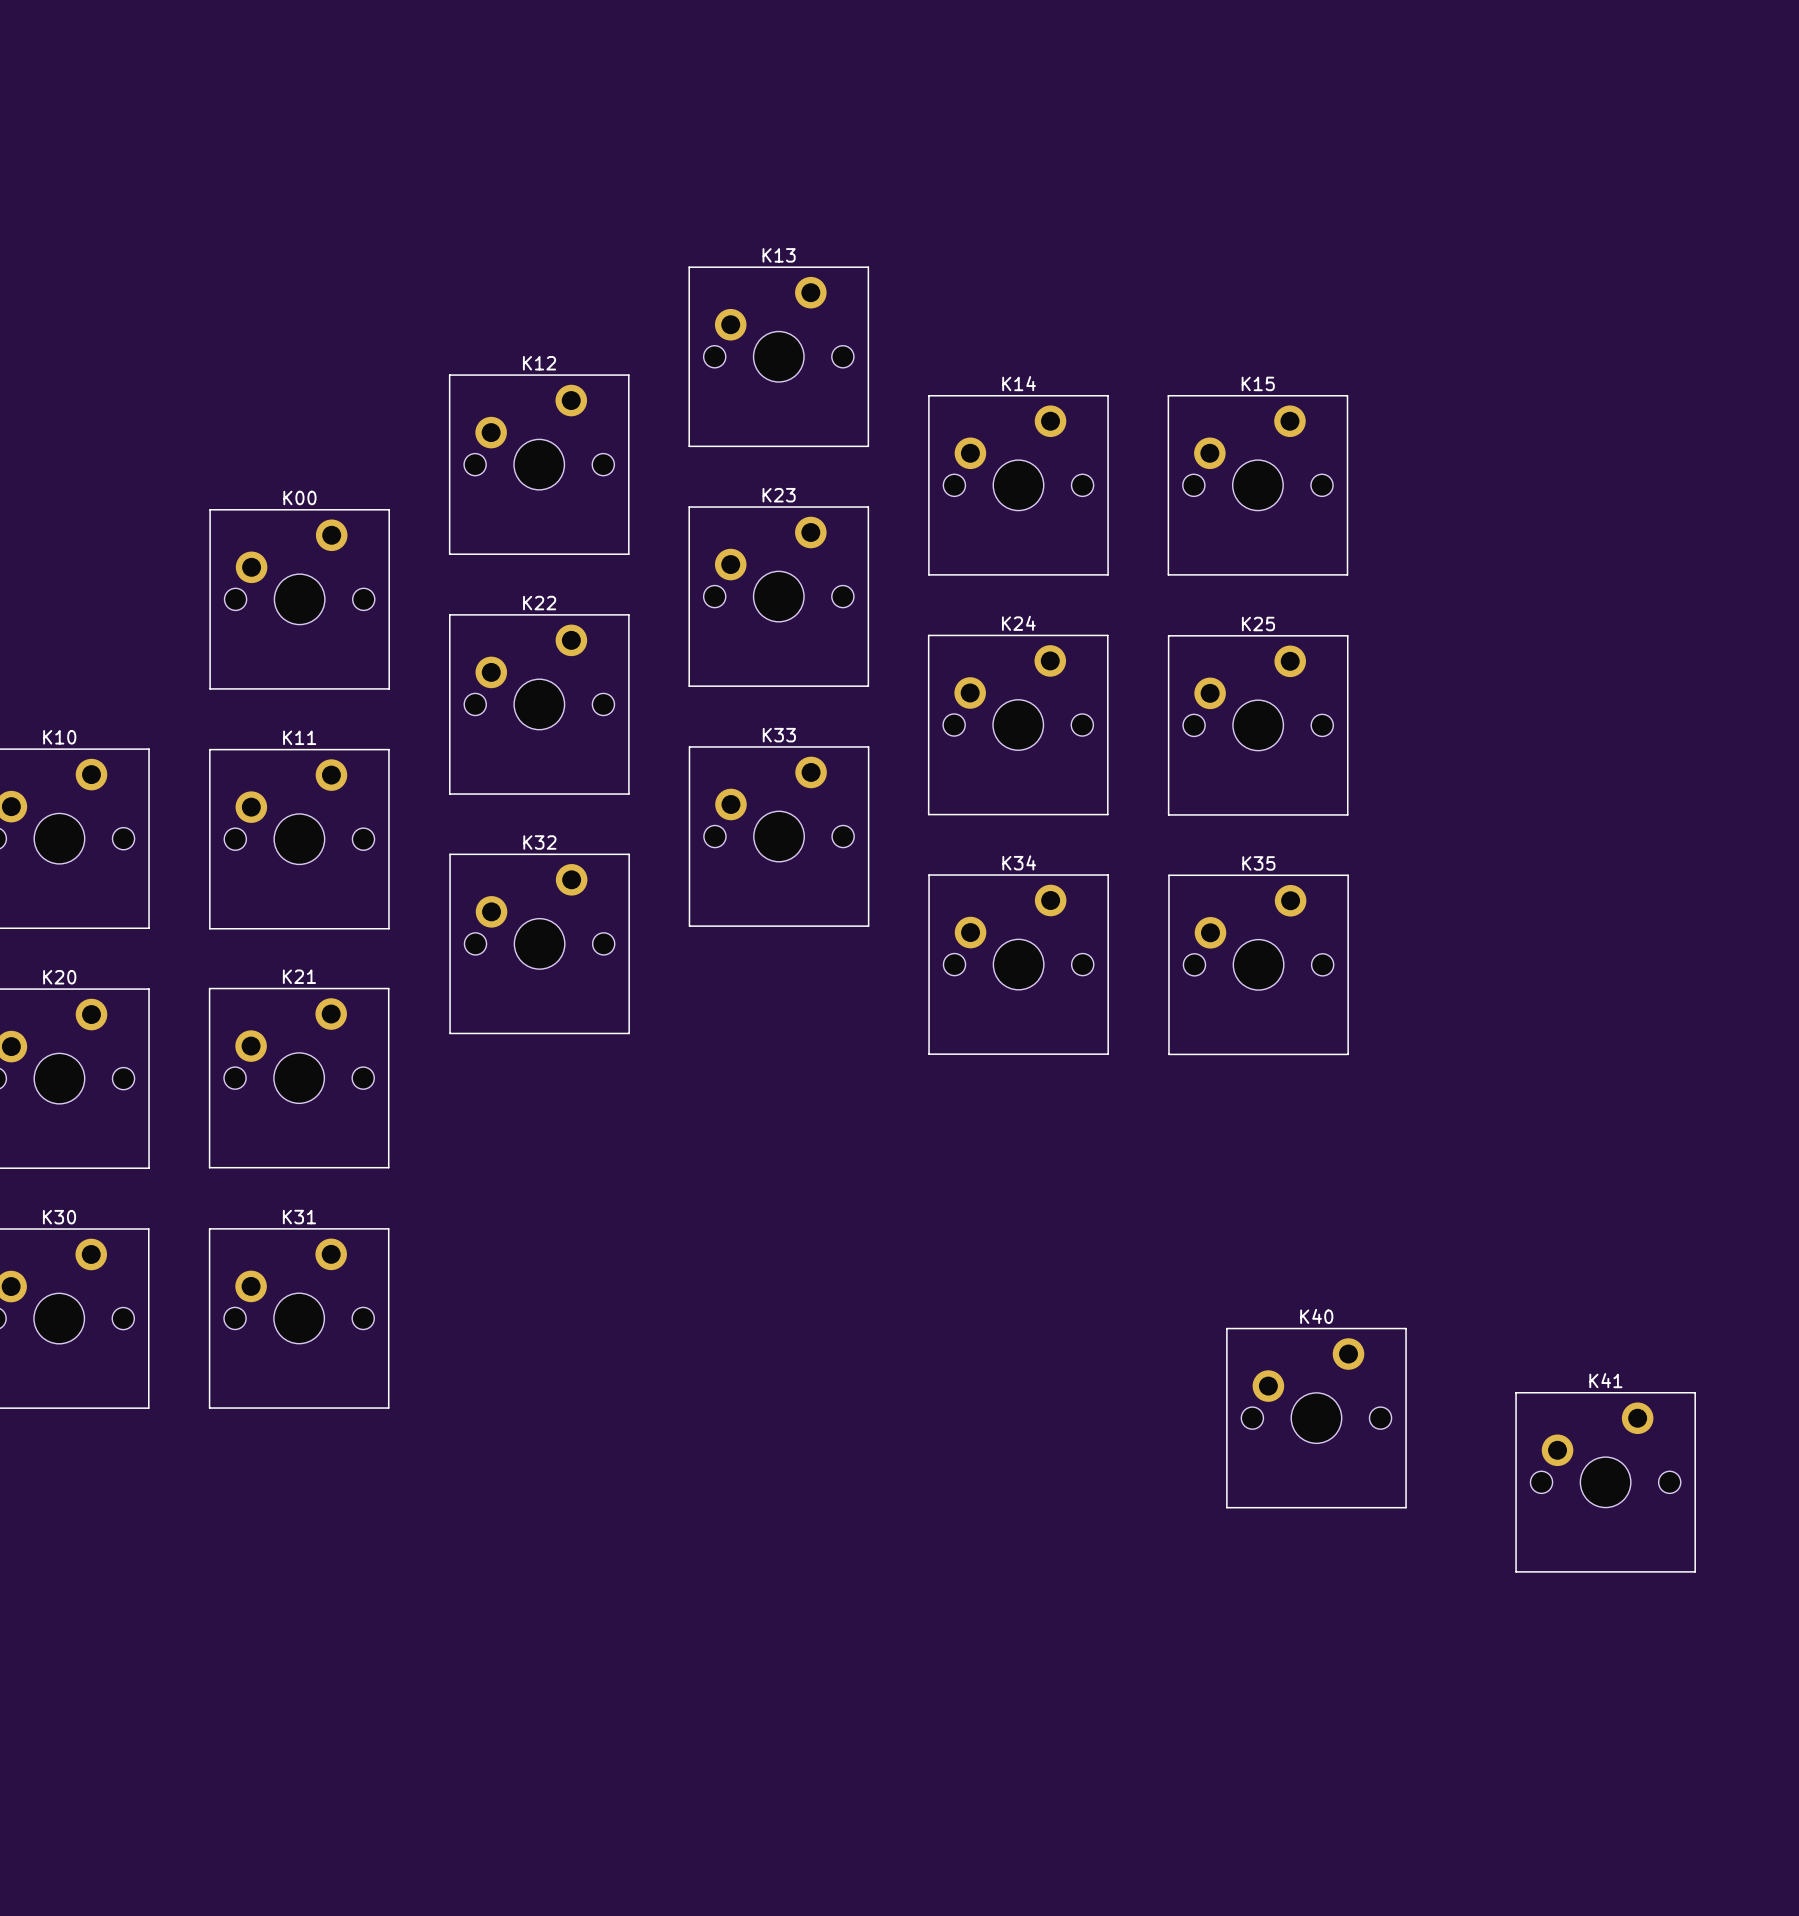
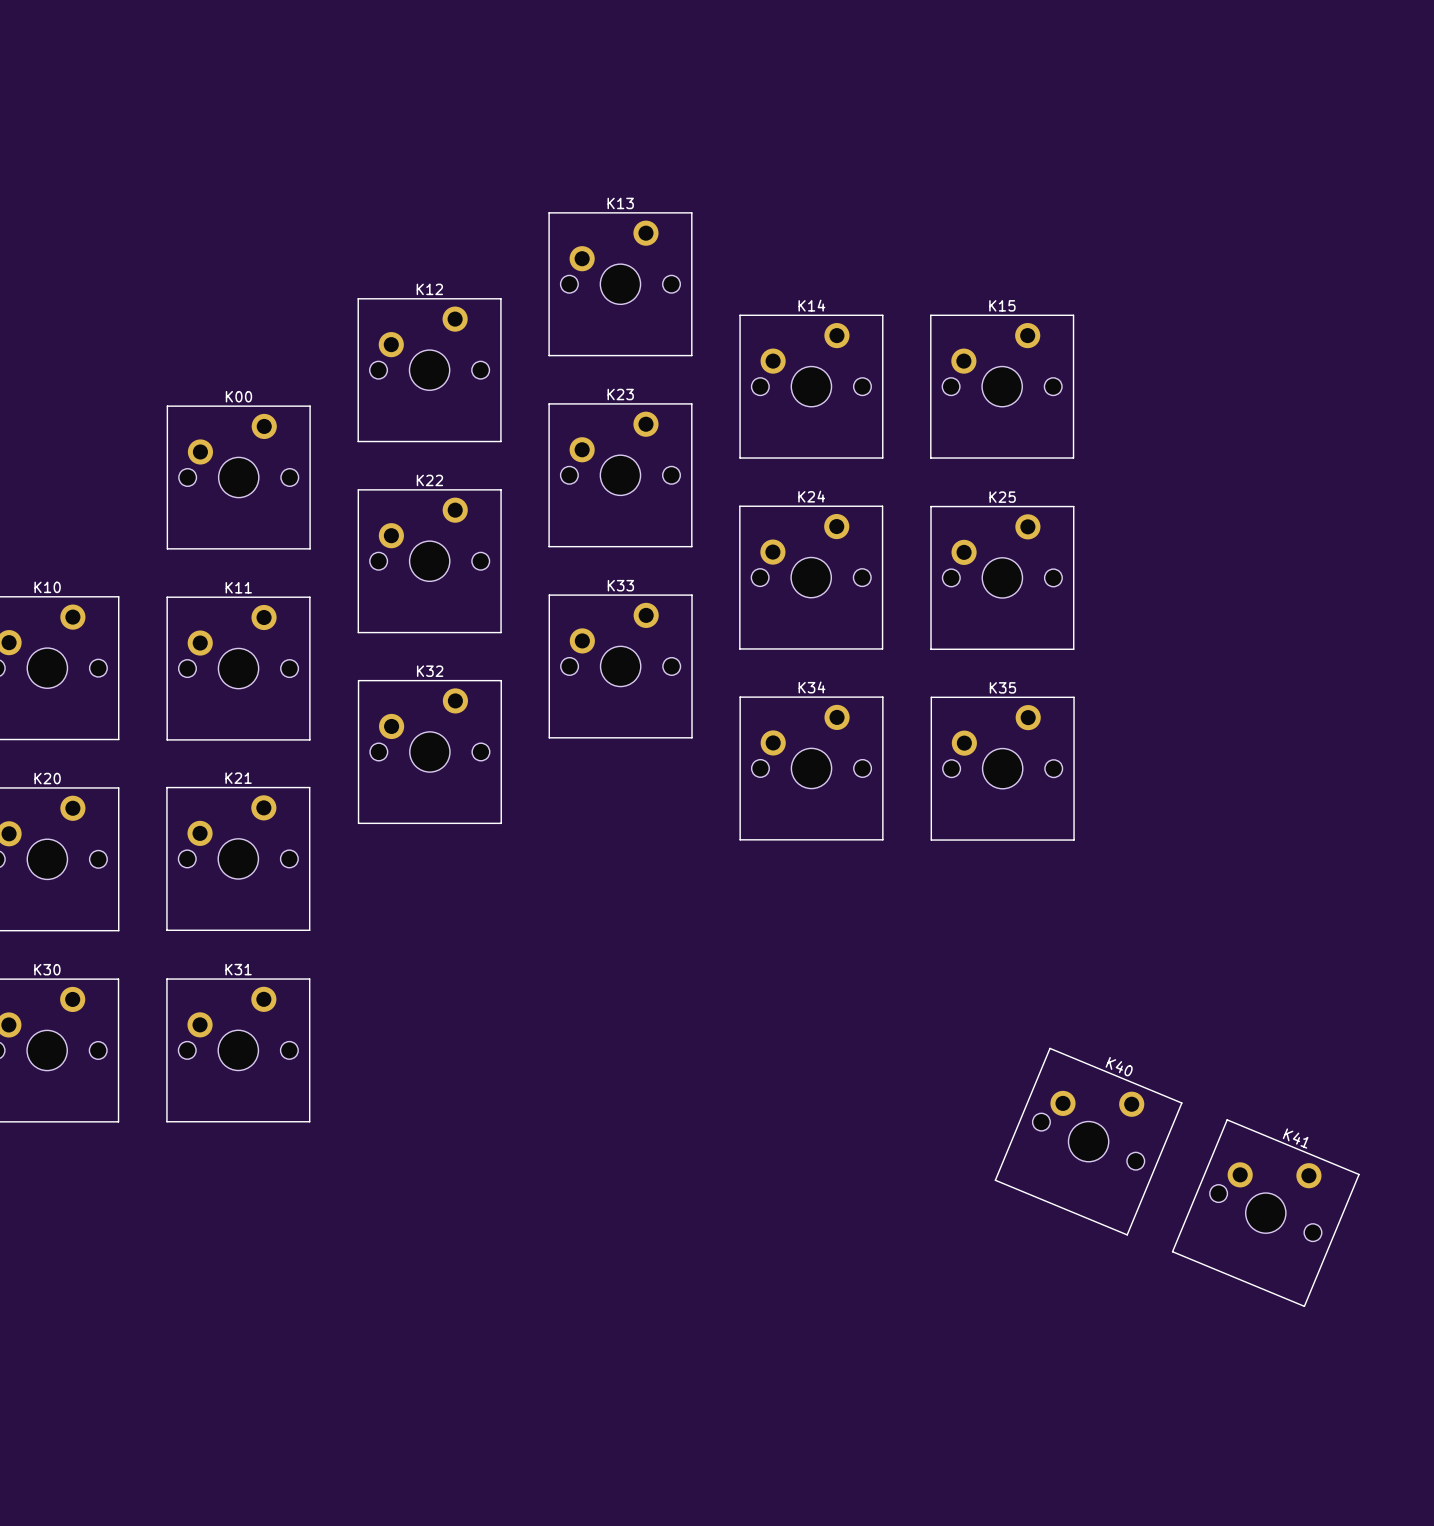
K40 rotation: 0° (1316, 1418) -> 22.5° clockwise (1088, 1141)
K41 rotation: 0° (1605, 1482) -> 22.5° clockwise (1265, 1213)

